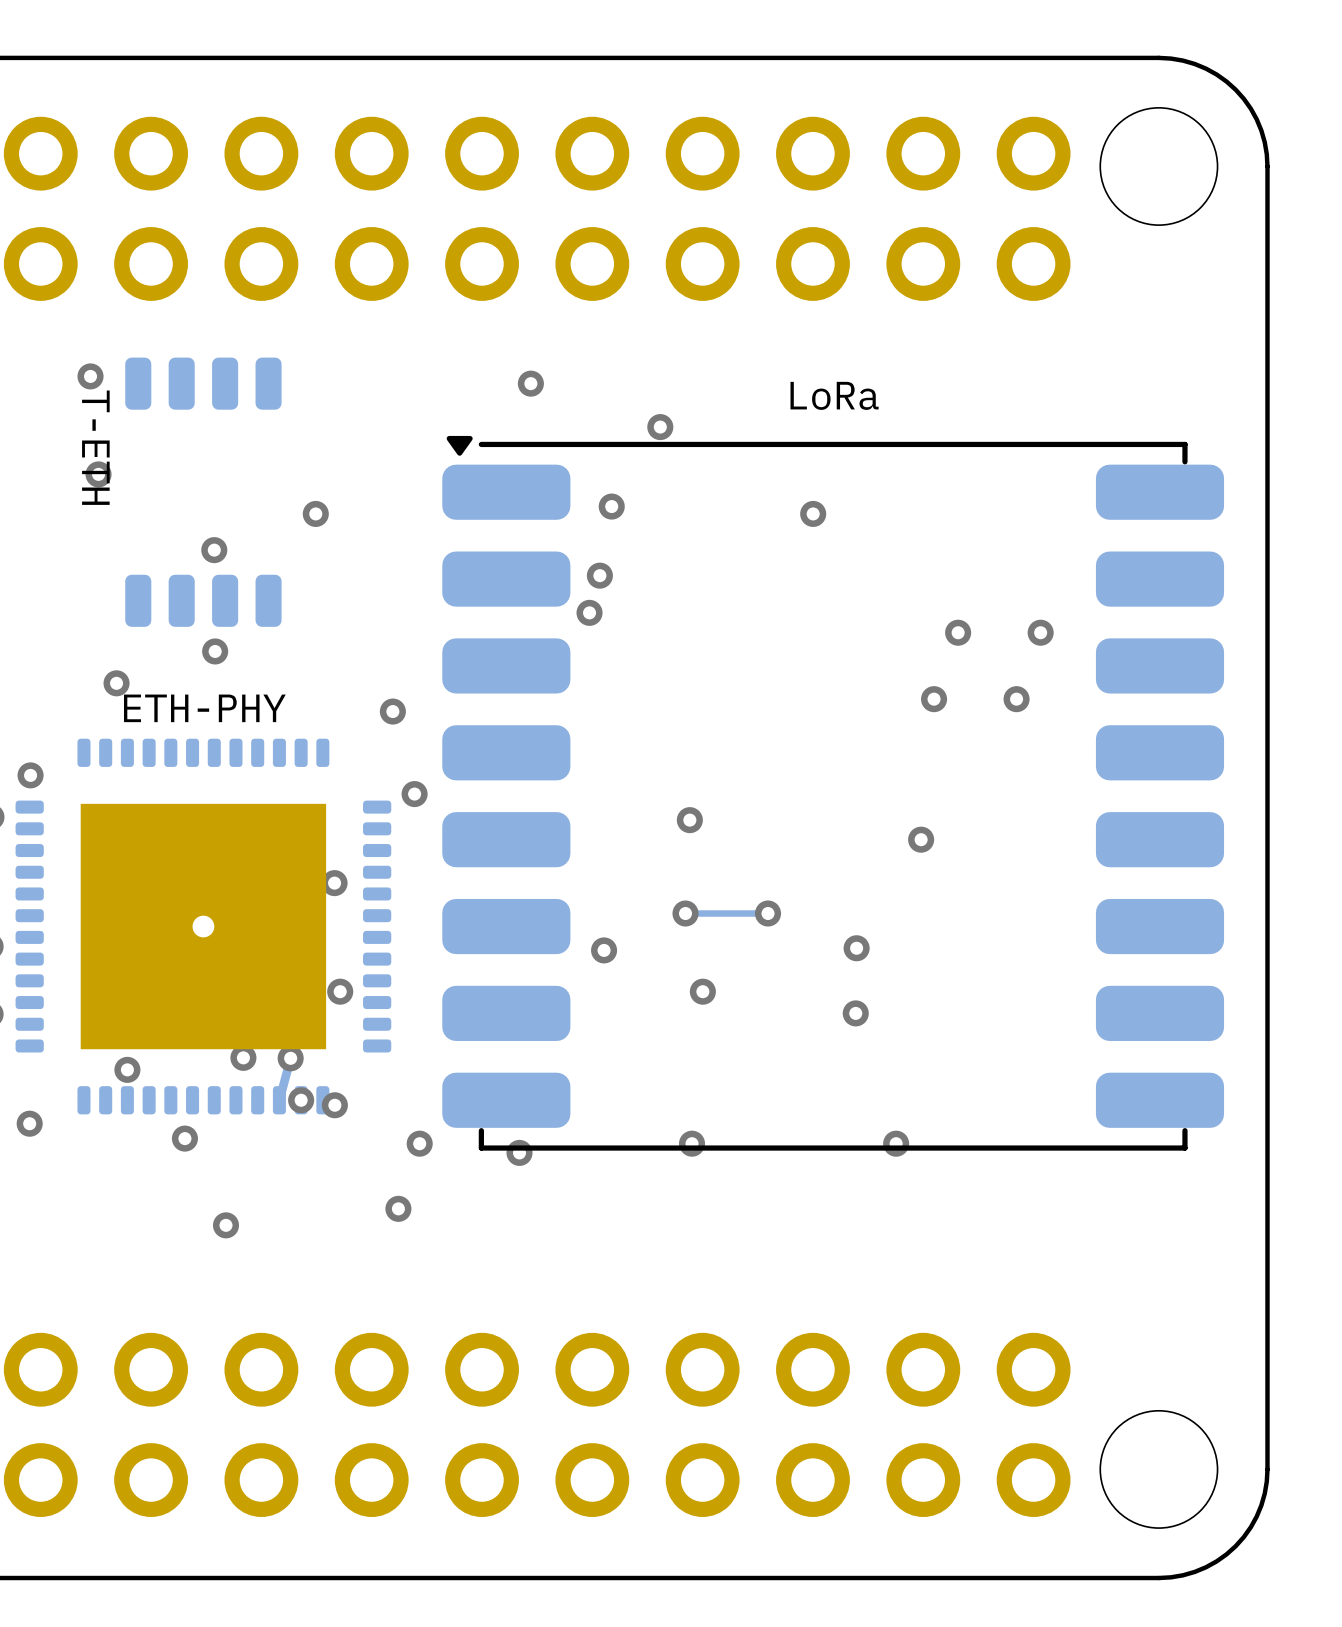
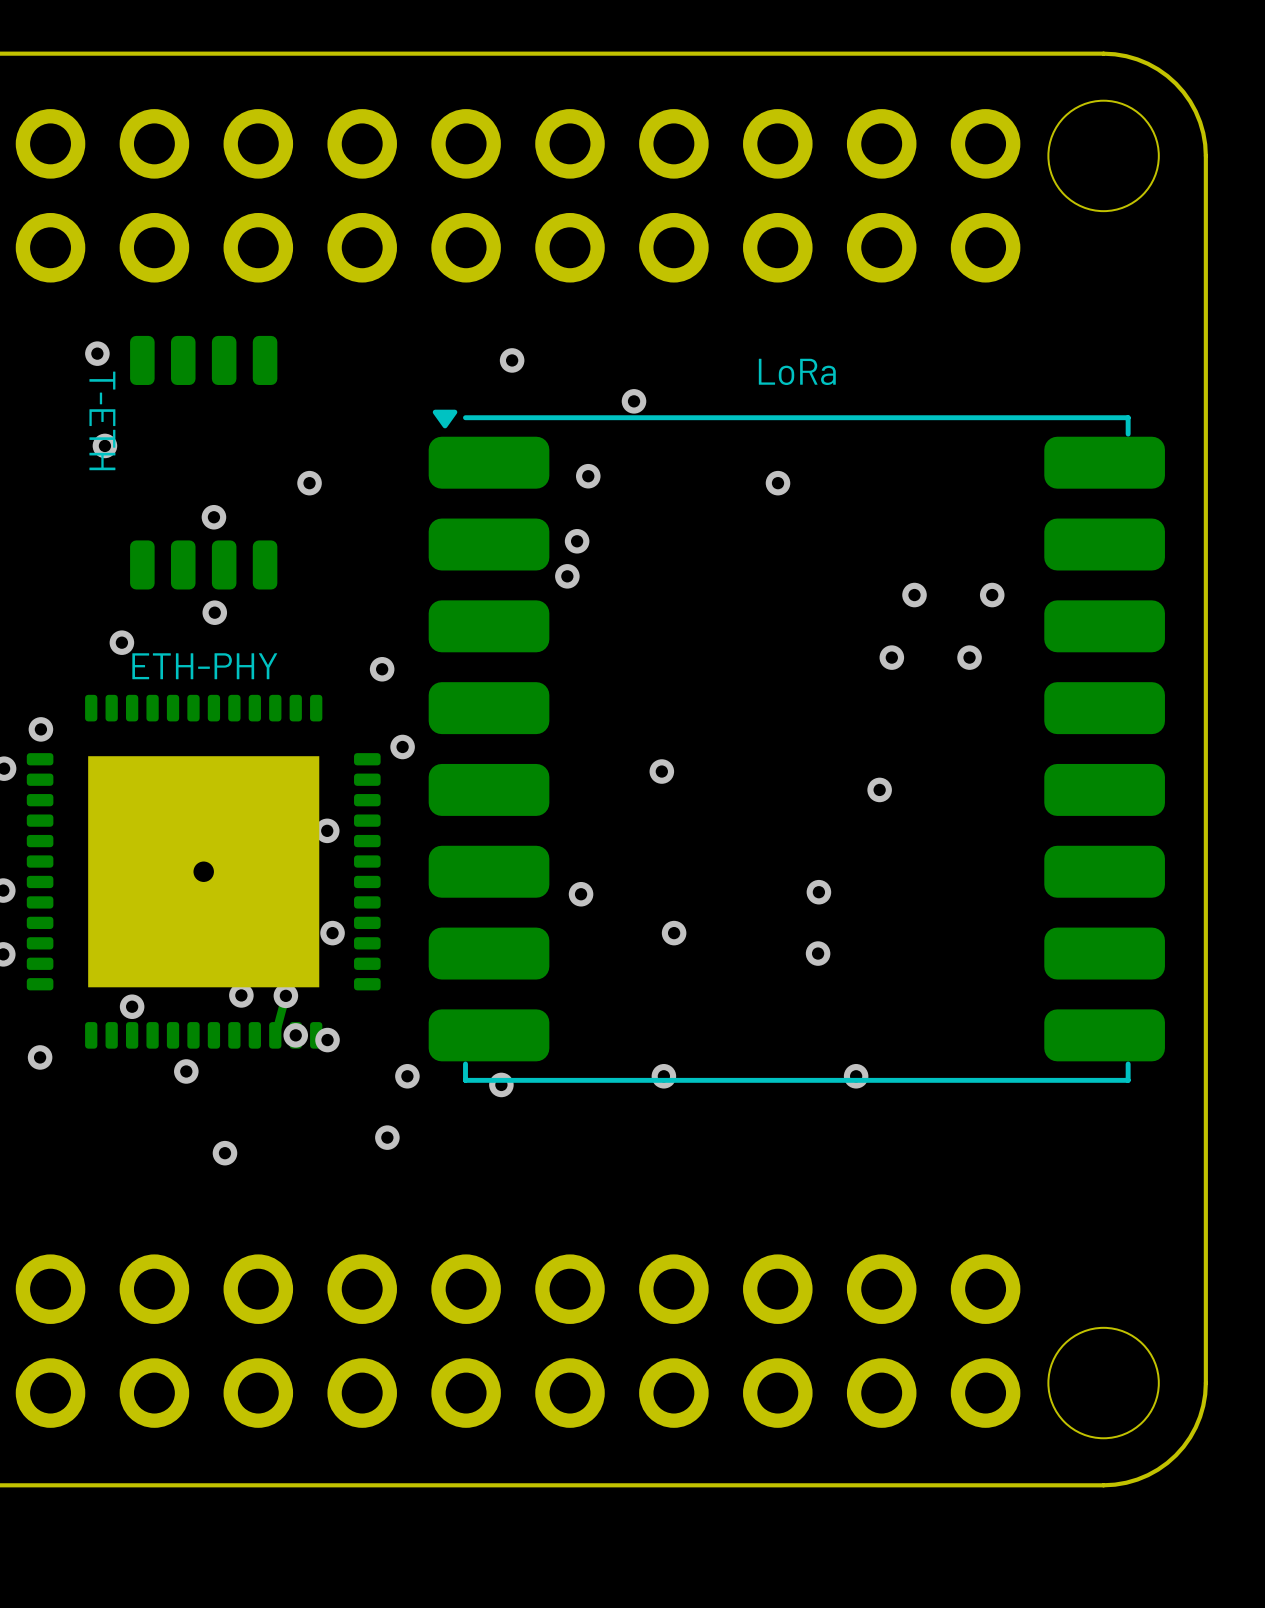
via: (685, 913) -> none
track: (768, 913) (685, 913) -> none
via: (768, 913) -> none

